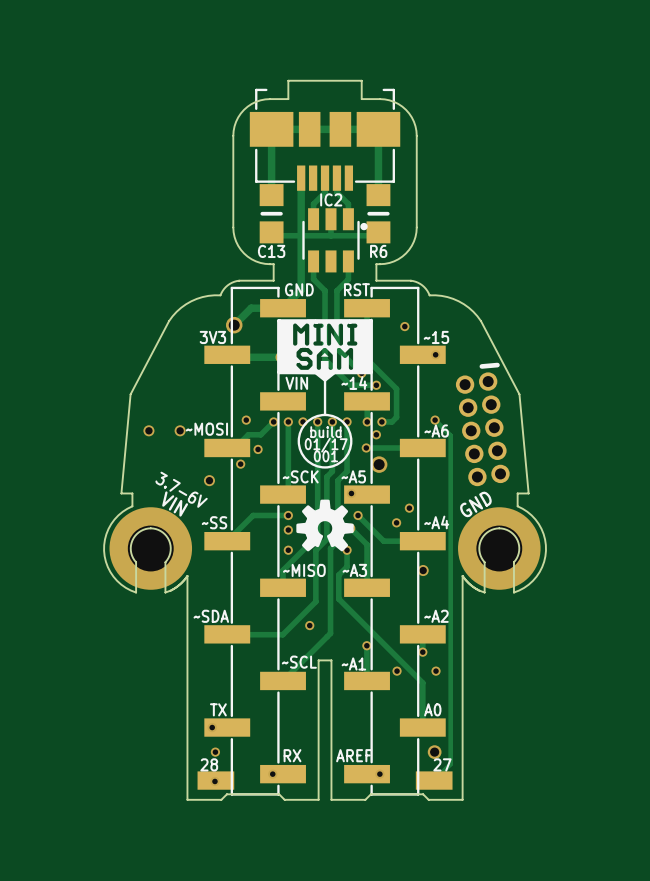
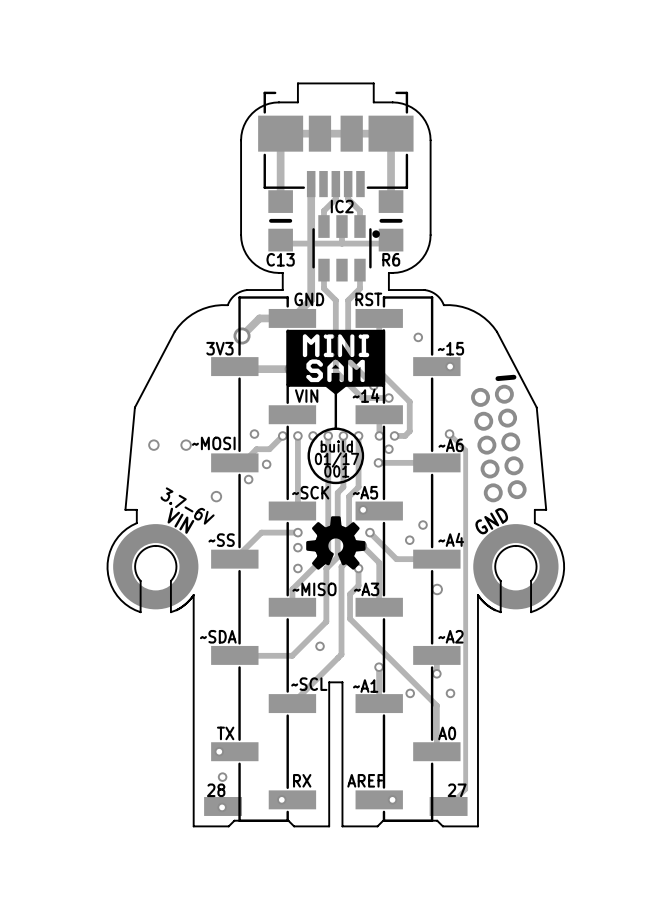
via: (379, 464) -> none
via: (434, 752) -> none

